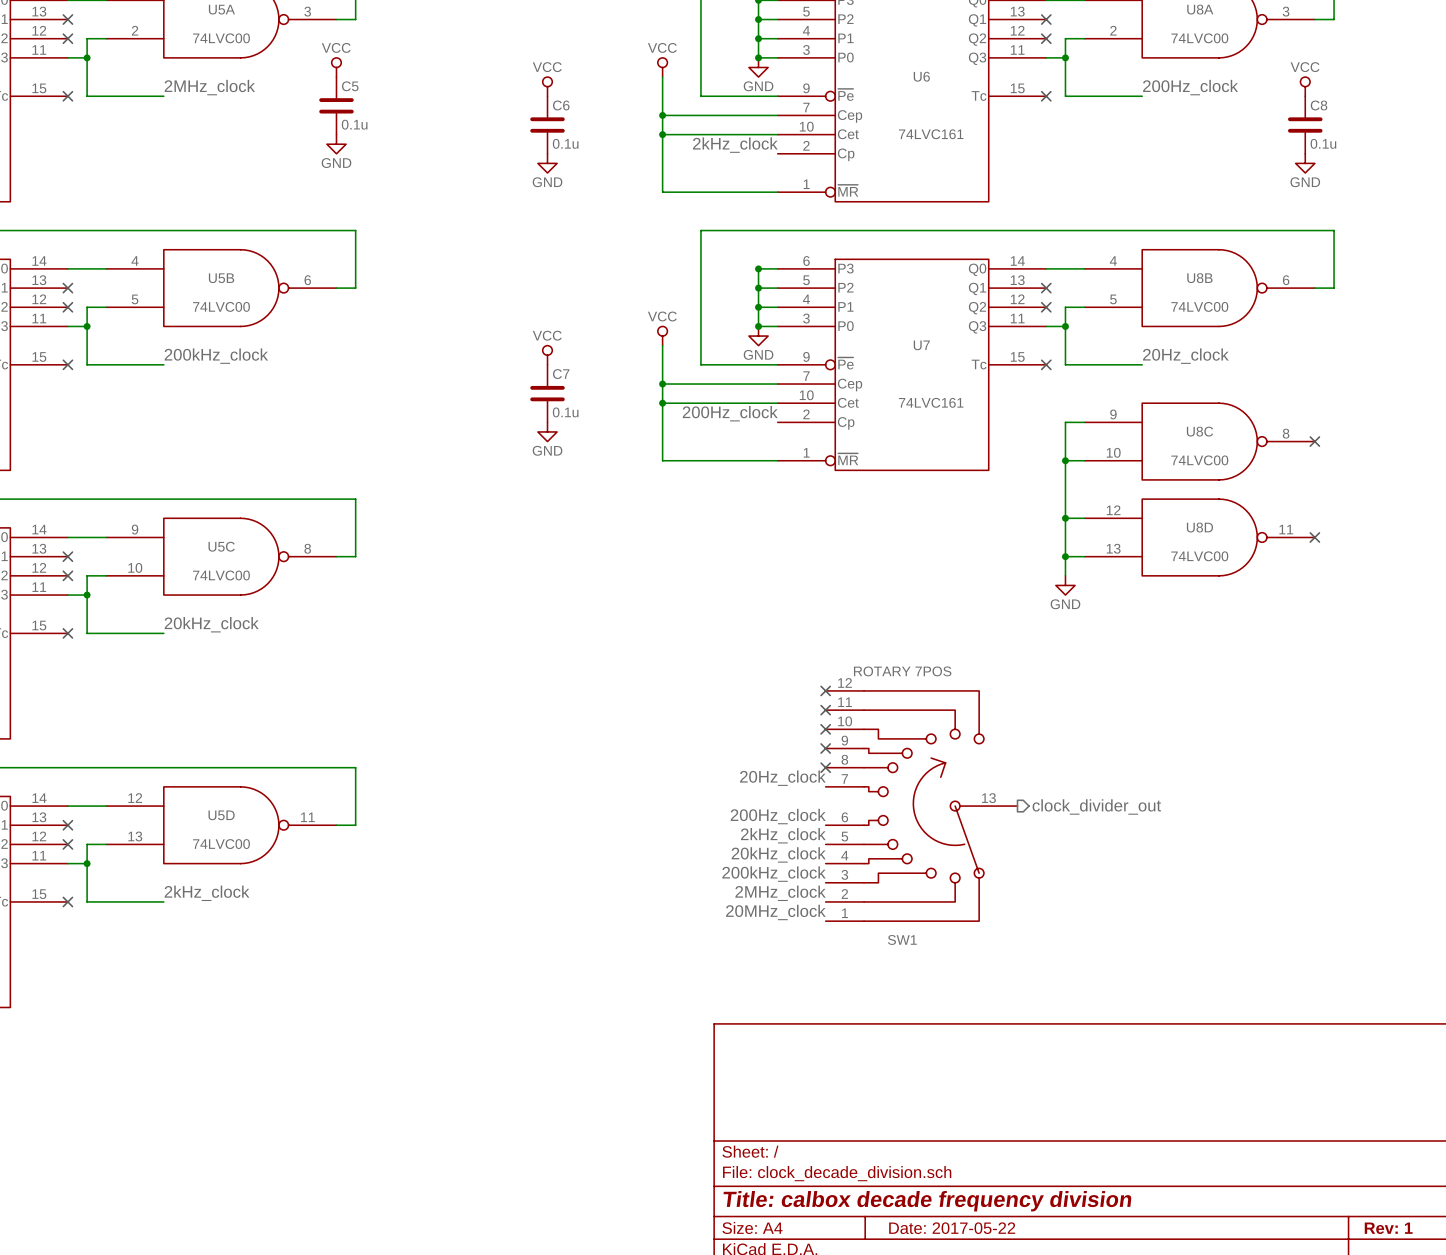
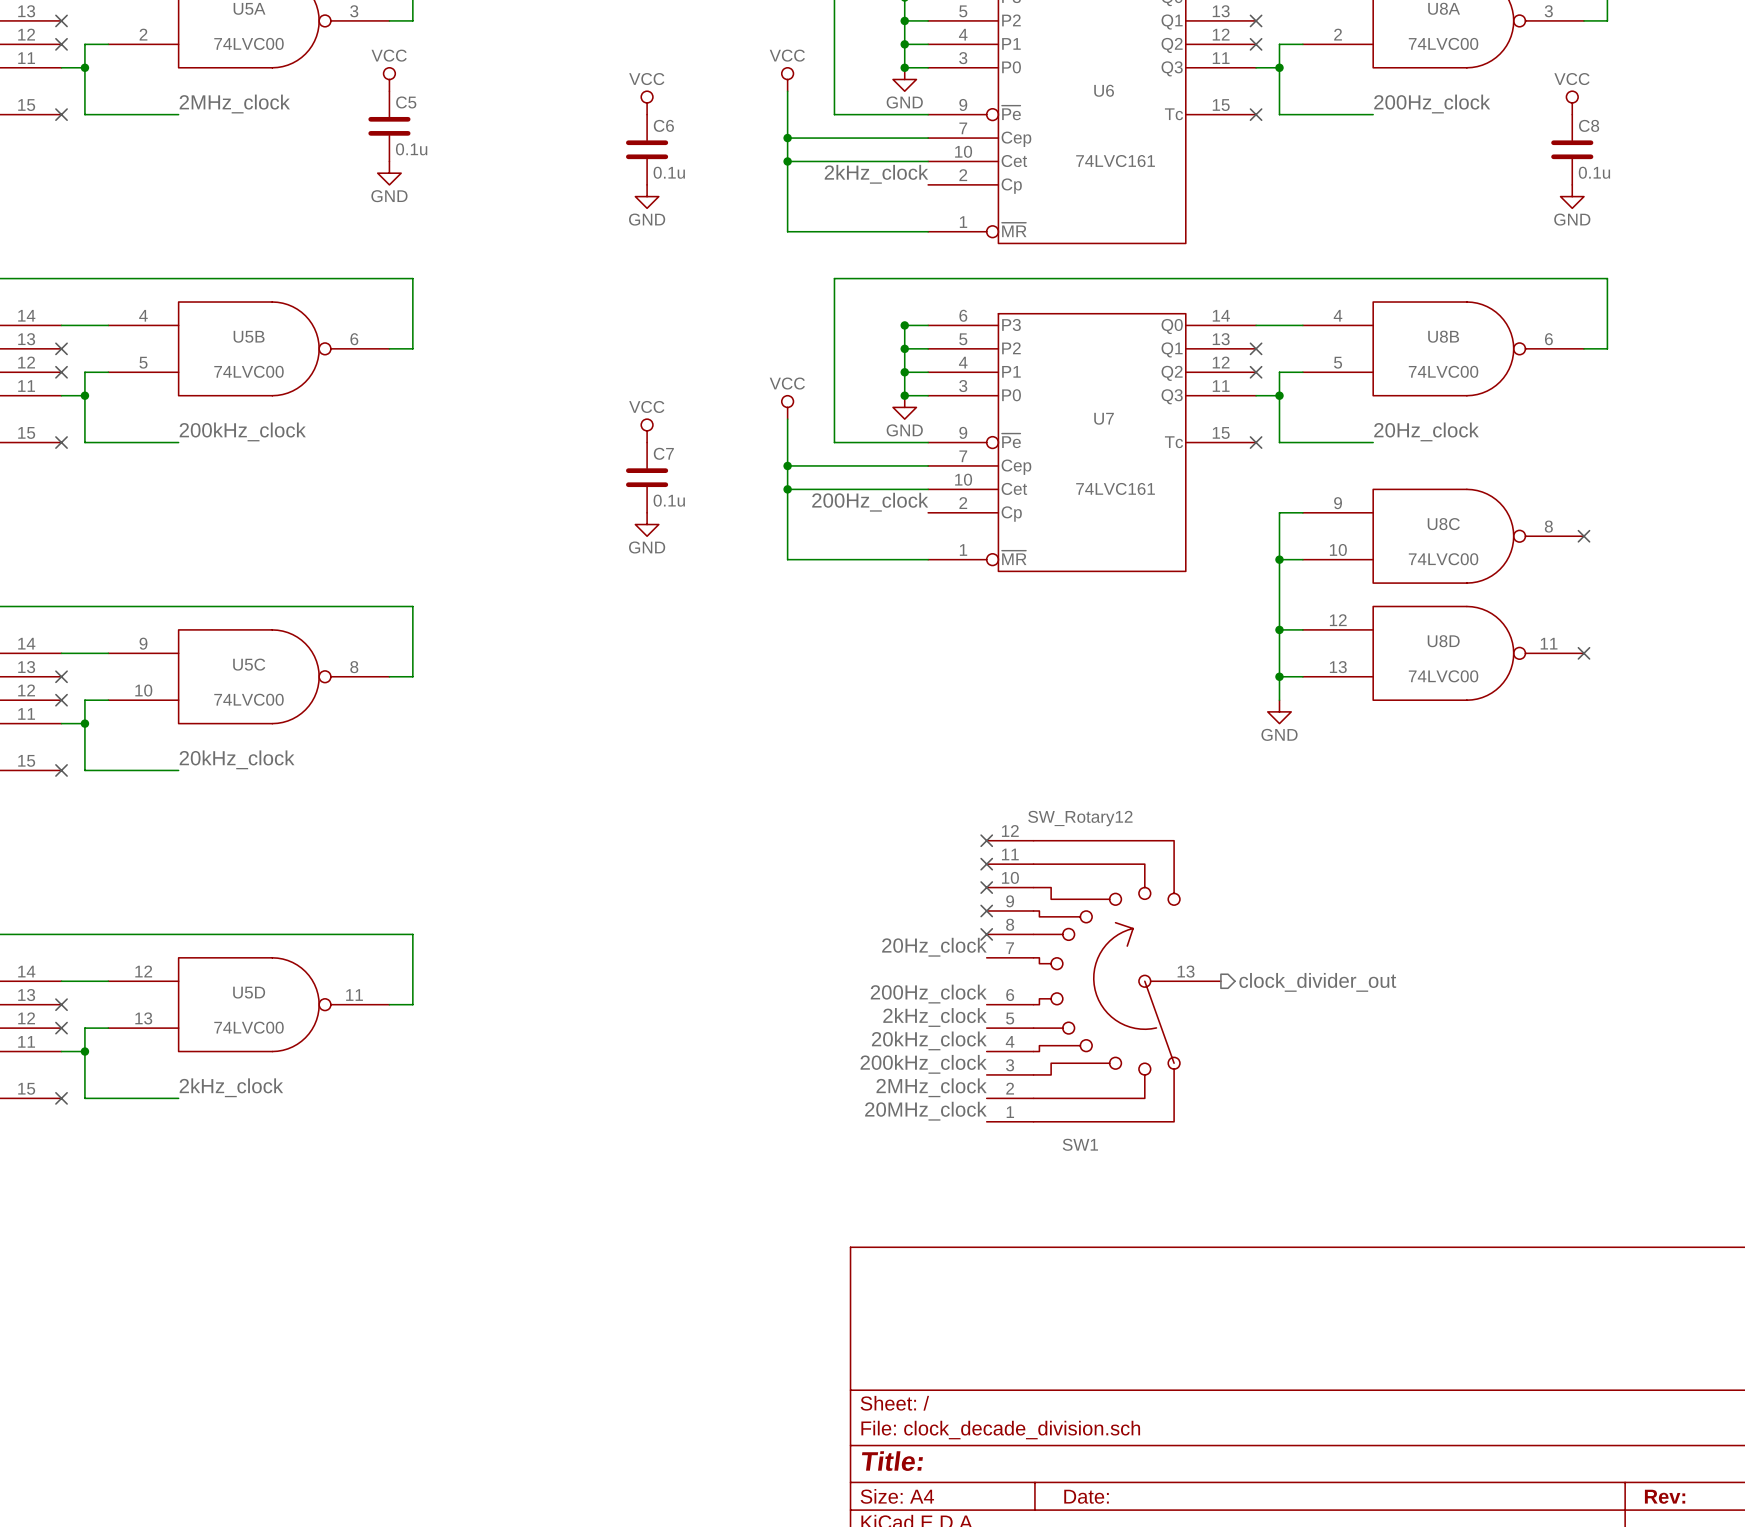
SW1 value: ROTARY 7POS (902, 671) -> SW_Rotary12 (1080, 818)
title block: Title: calbox decade frequency division (927, 1201) -> Title: (892, 1461)
title block: Date: 2017-05-22 (952, 1228) -> Date: (1086, 1496)
title block: Rev: 1 (1388, 1228) -> Rev: (1665, 1496)

